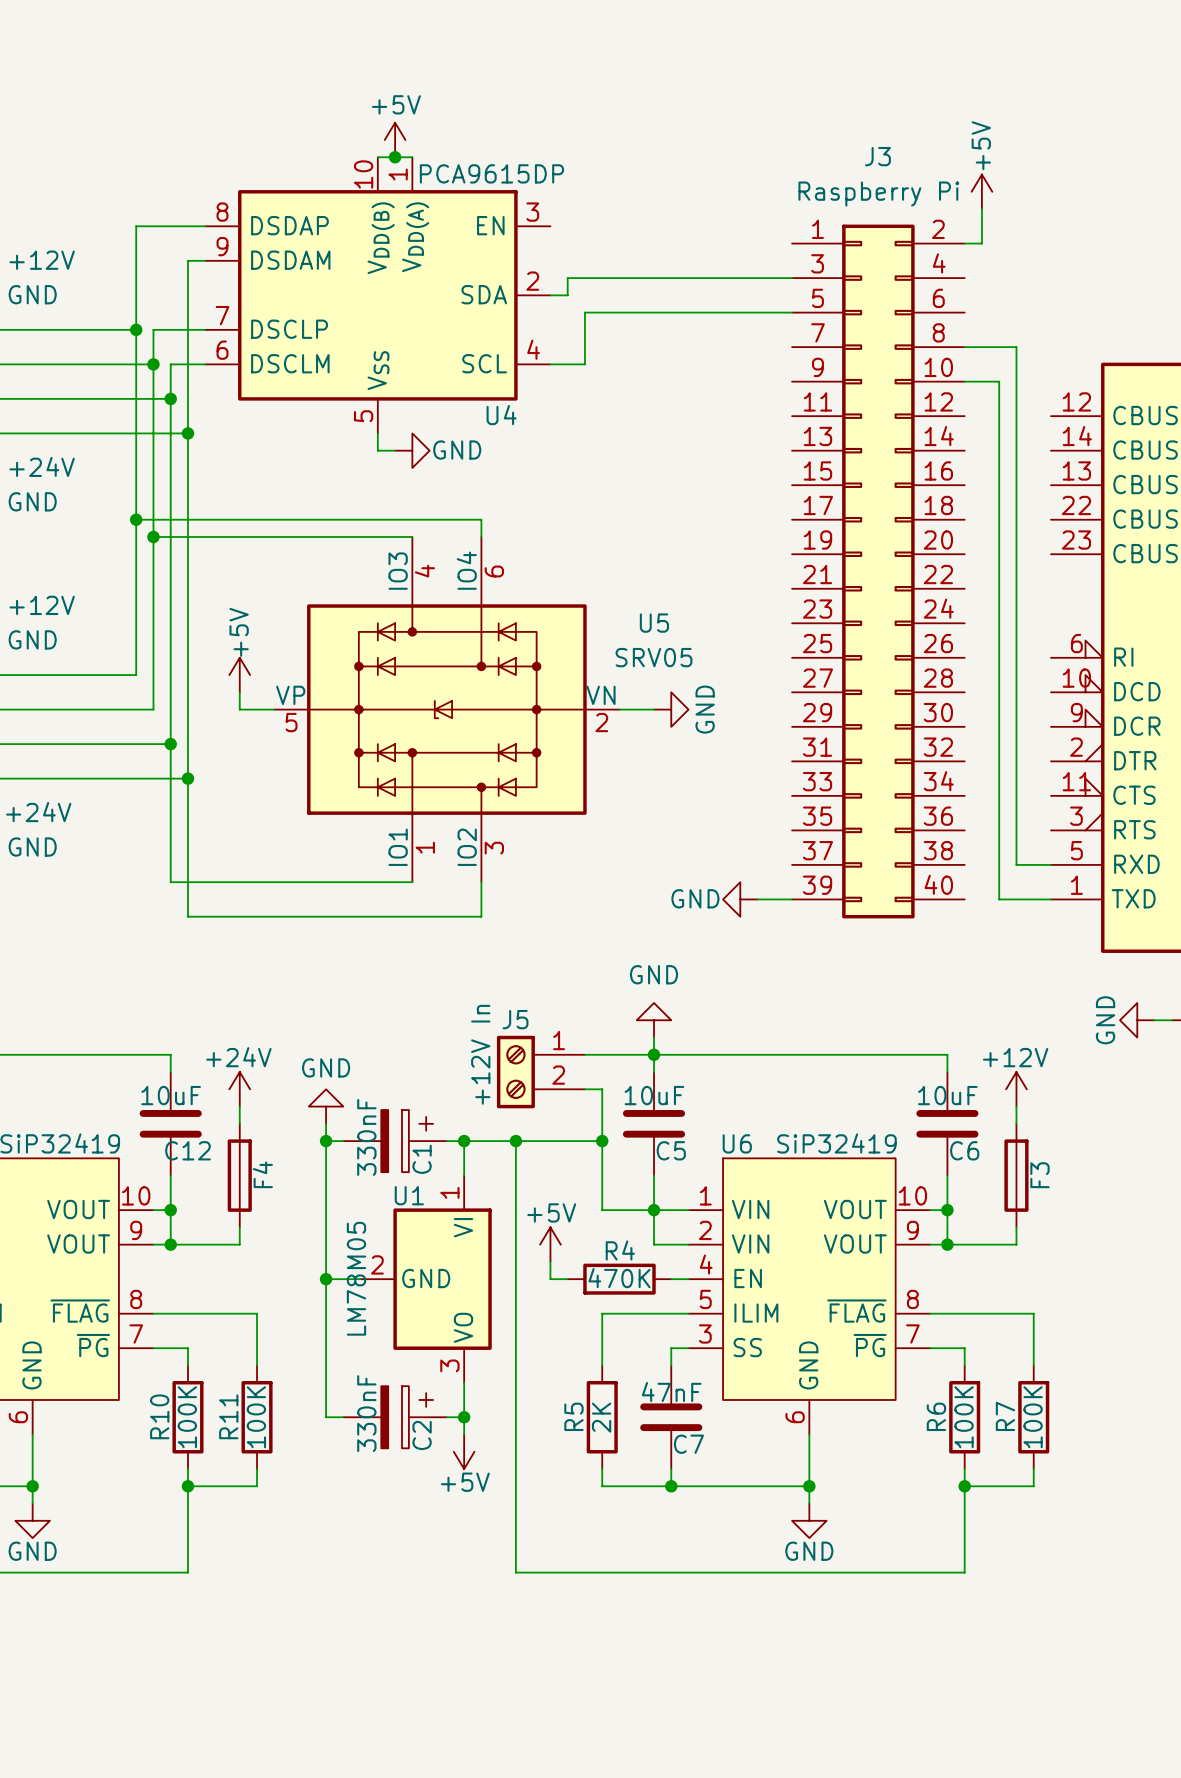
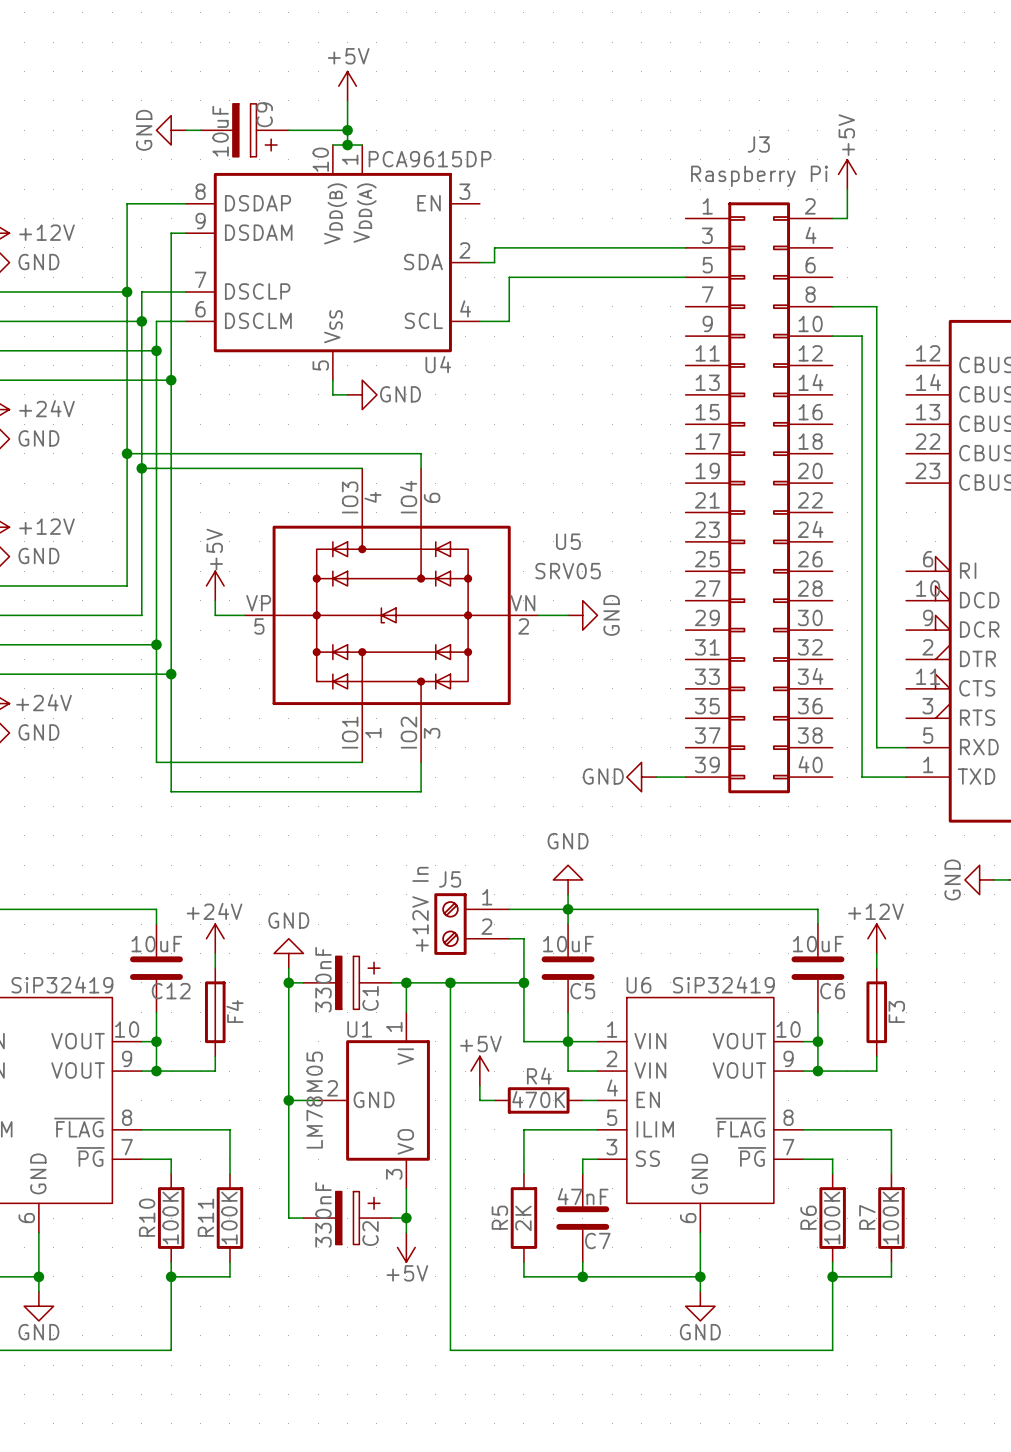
power symbol: none -> GND (171, 130)
wire: none -> (185, 130) (200, 130)
C9: none -> 10uF (244, 130)
wire: none -> (288, 130) (347, 130)
power symbol position: +5V (395, 140) -> +5V (347, 86)
junction: none -> (347, 130)

